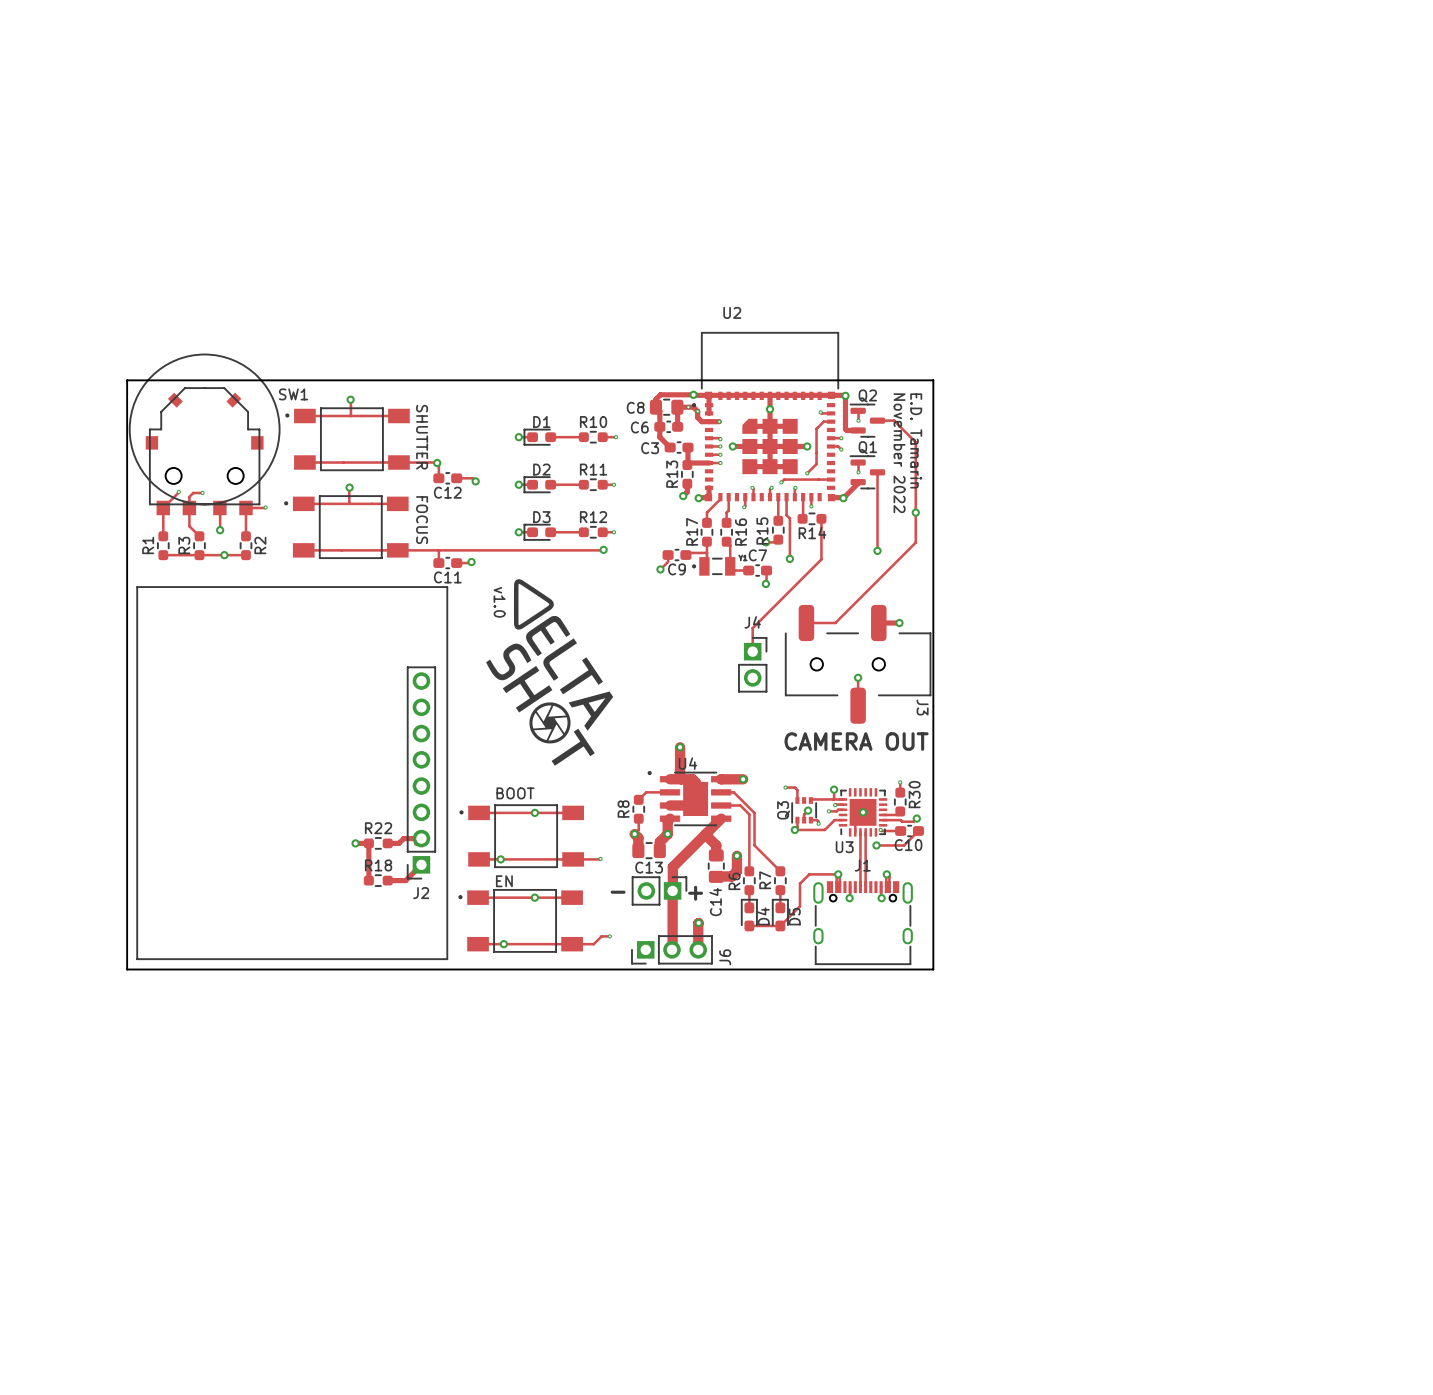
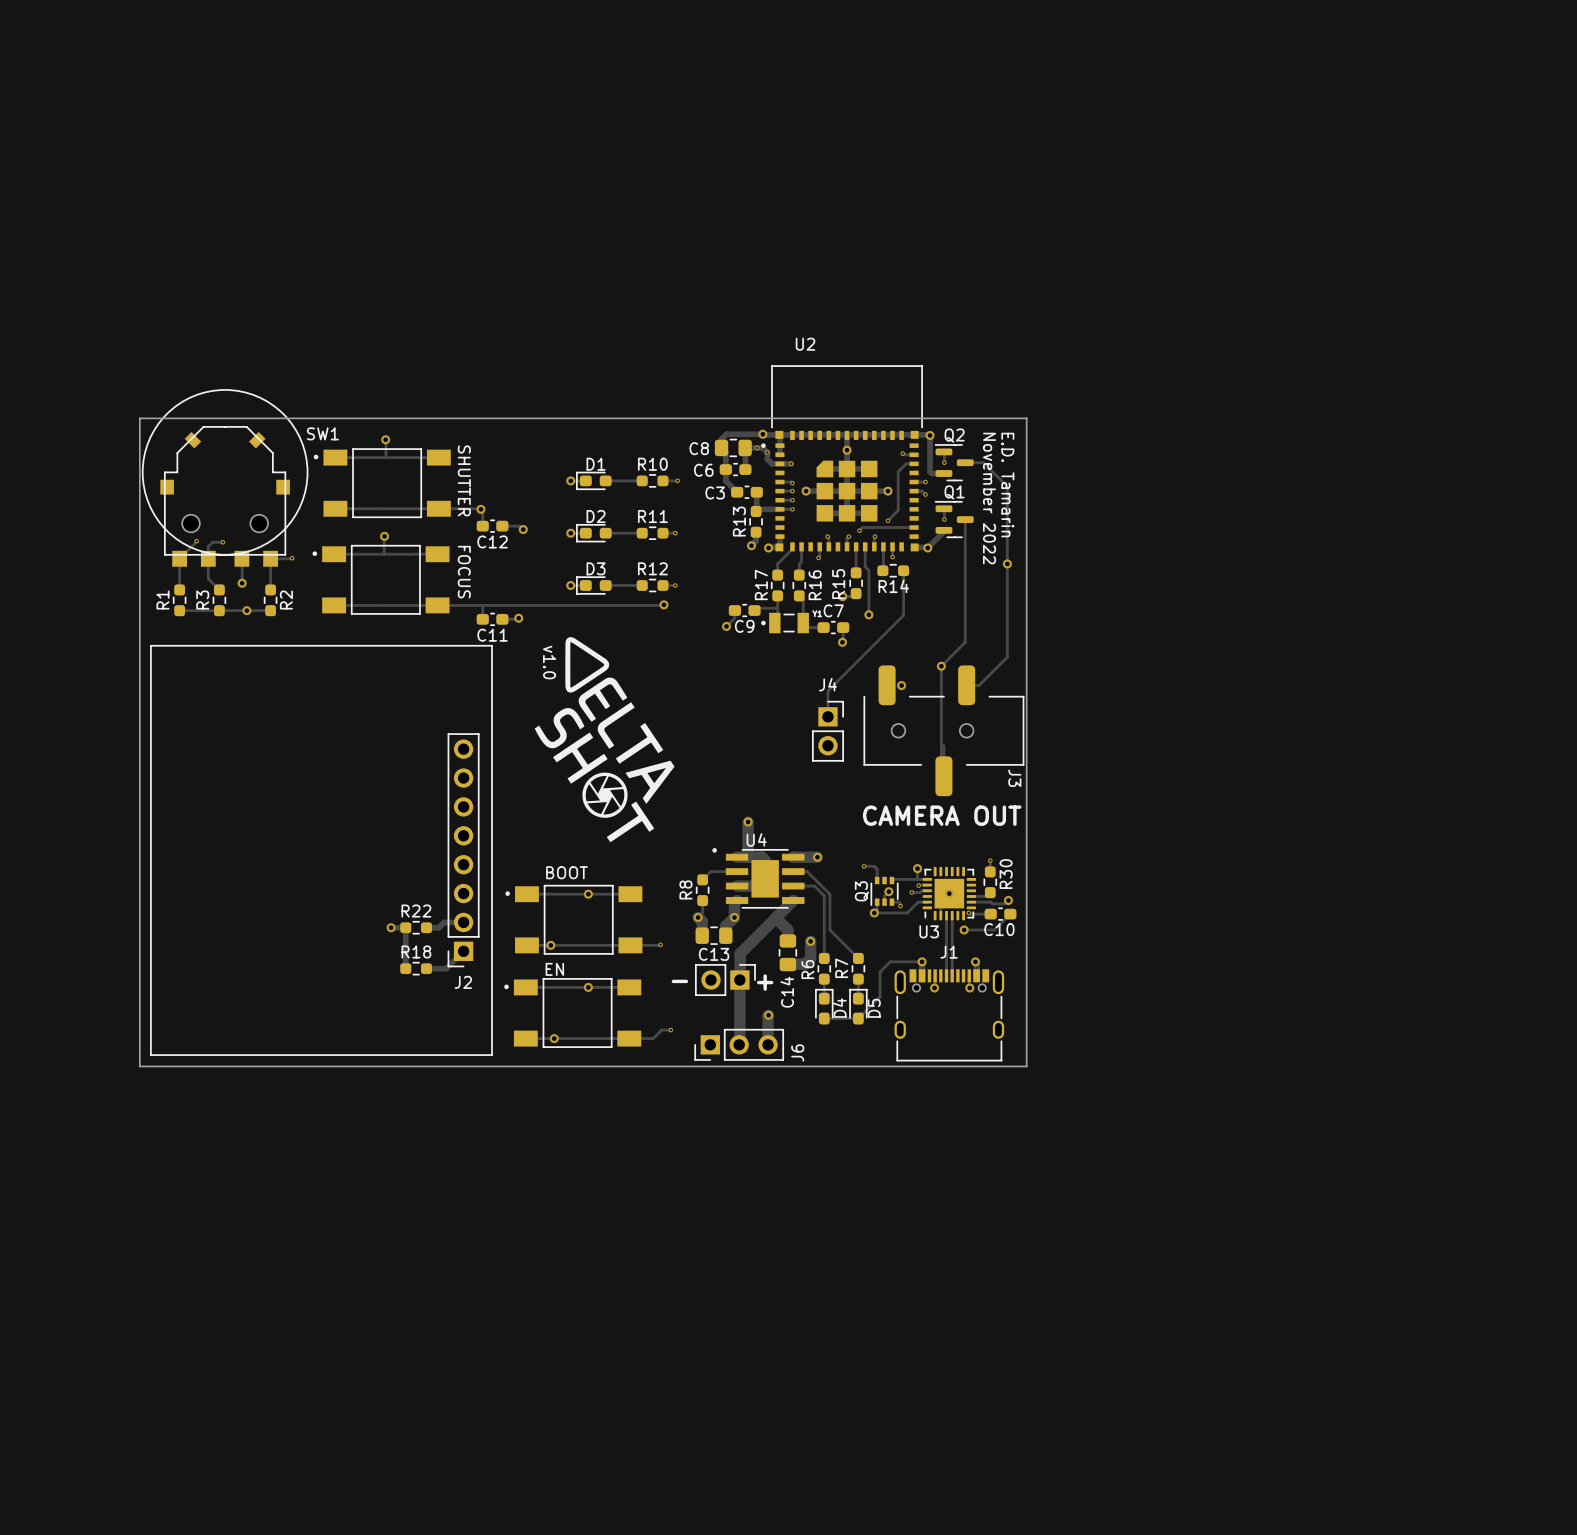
track: (915, 542) (835, 623) (806, 623) -> (1007, 596) (1007, 657) (978, 685) (964, 685)
track: none -> (965, 605) (965, 642) (941, 666) (941, 776)
via: (877, 550) -> none
via: none -> (941, 666)
via: none -> (901, 685)
track: (878, 623) (899, 623) -> none
via: (899, 623) -> none
via: (858, 677) -> none

